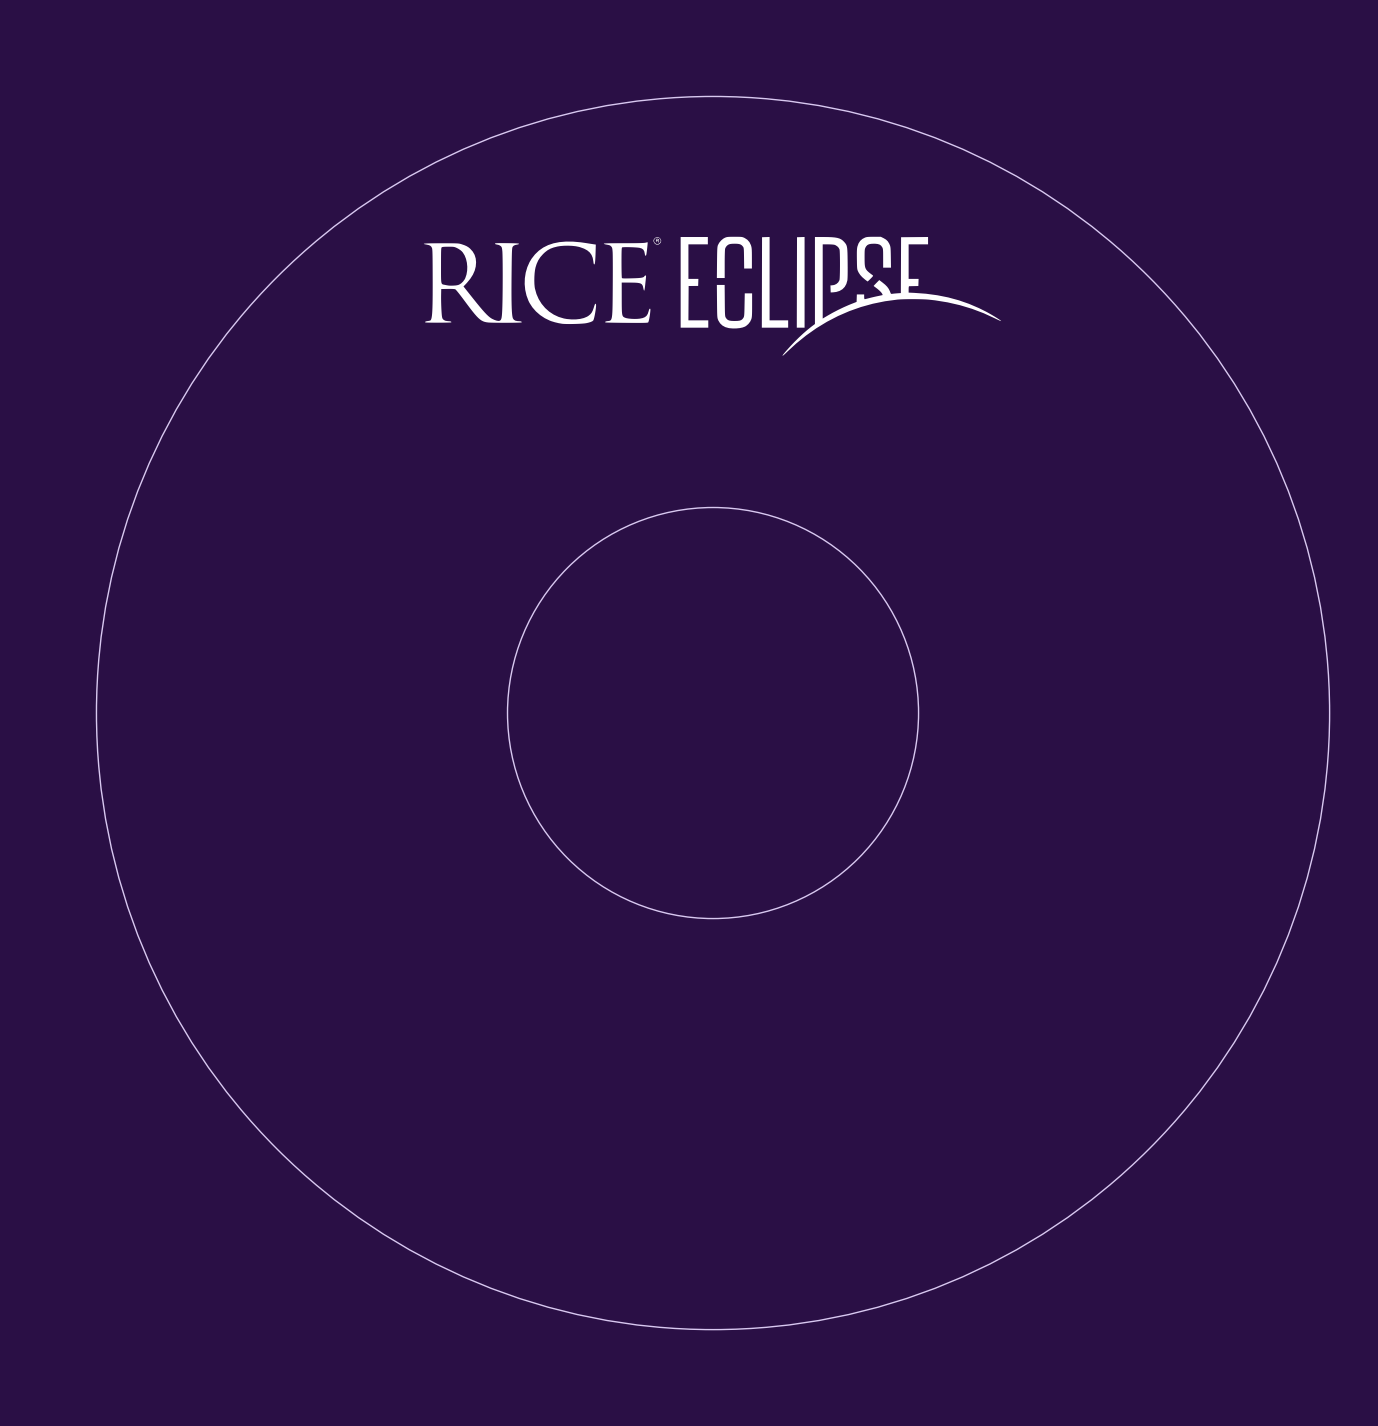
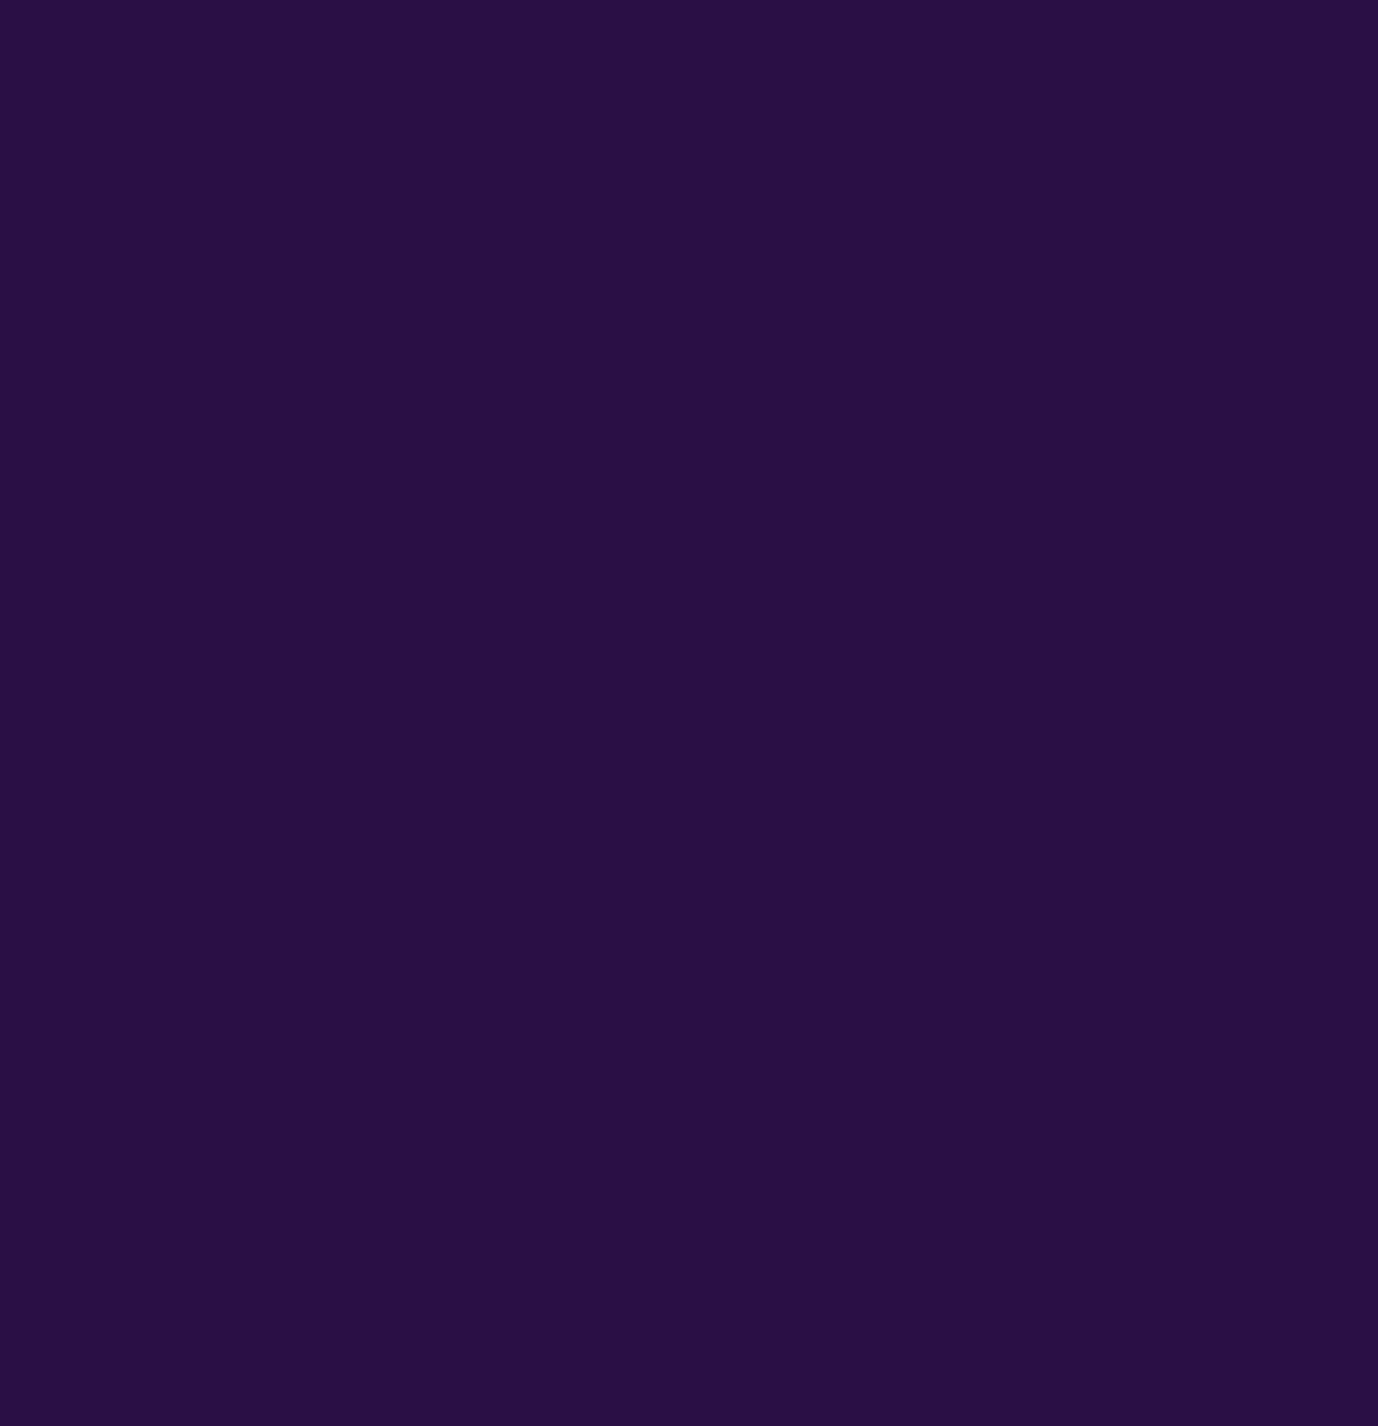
round board edge: [96, 96, 1331, 1331] -> none
drawing: [423, 236, 1002, 356] -> none
round board edge: [507, 507, 919, 919] -> none

